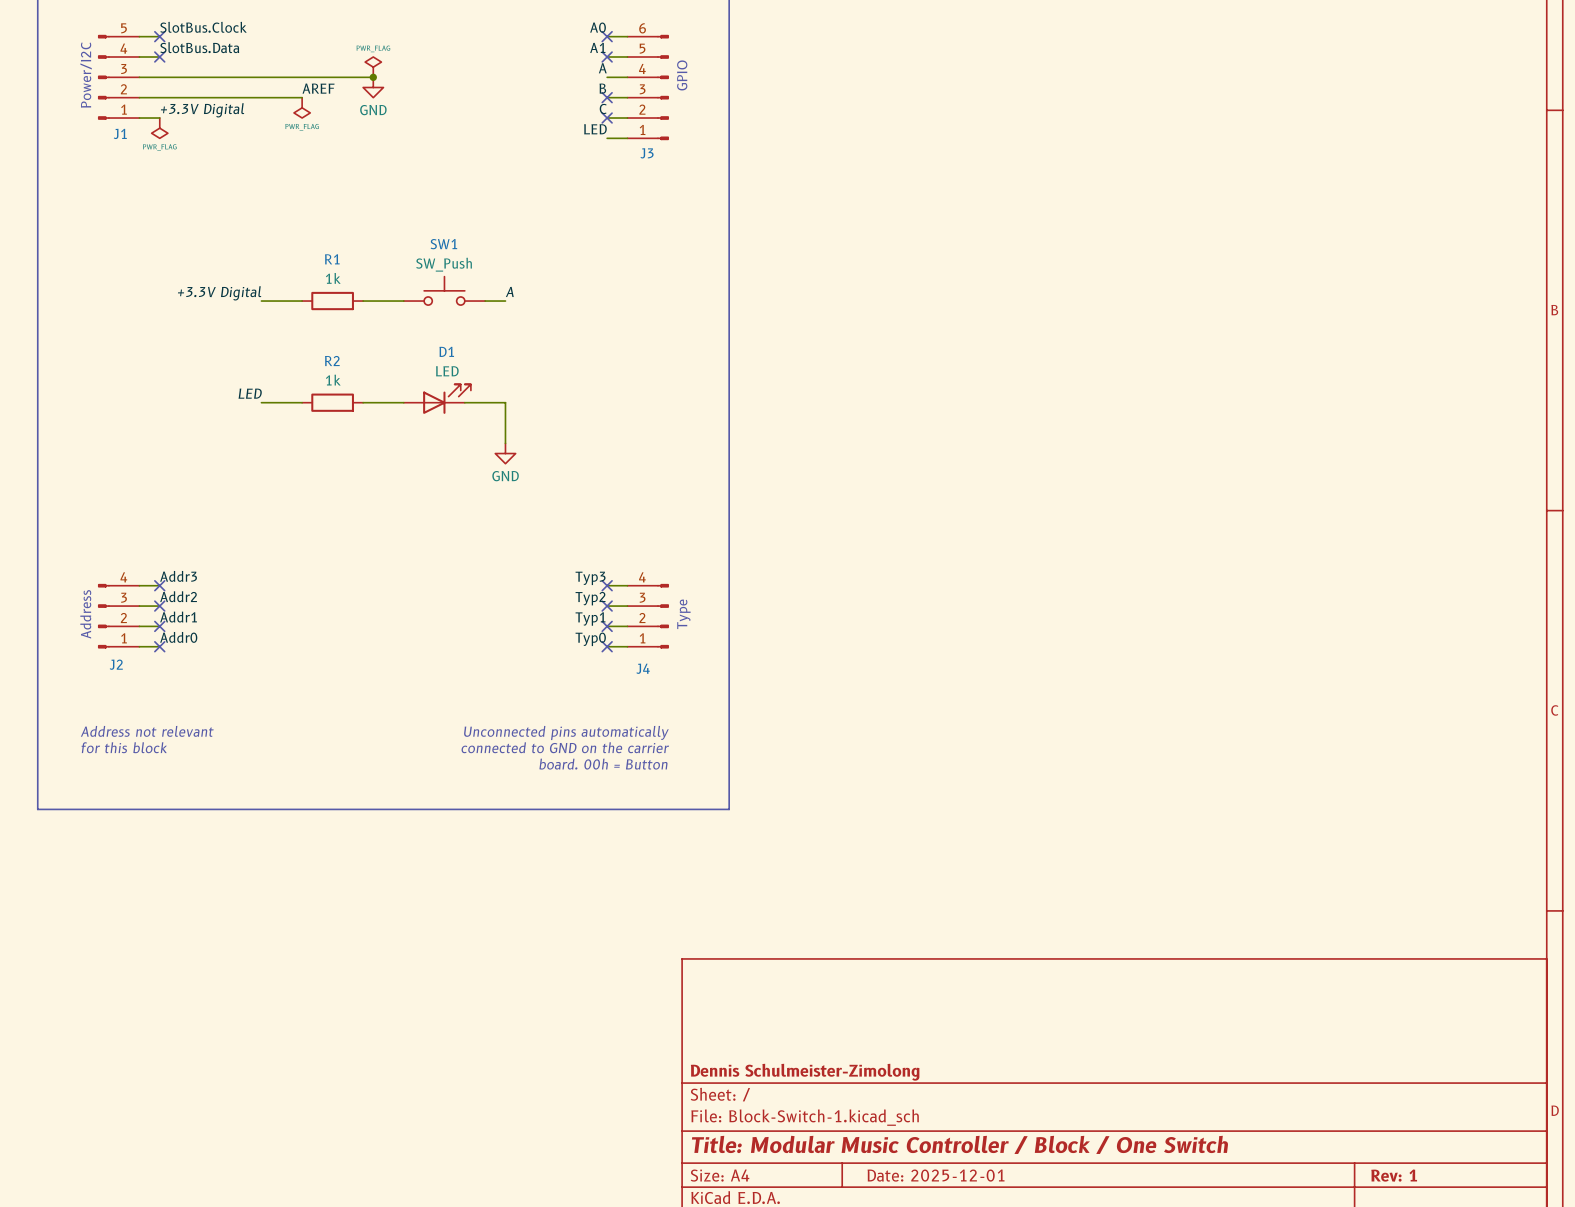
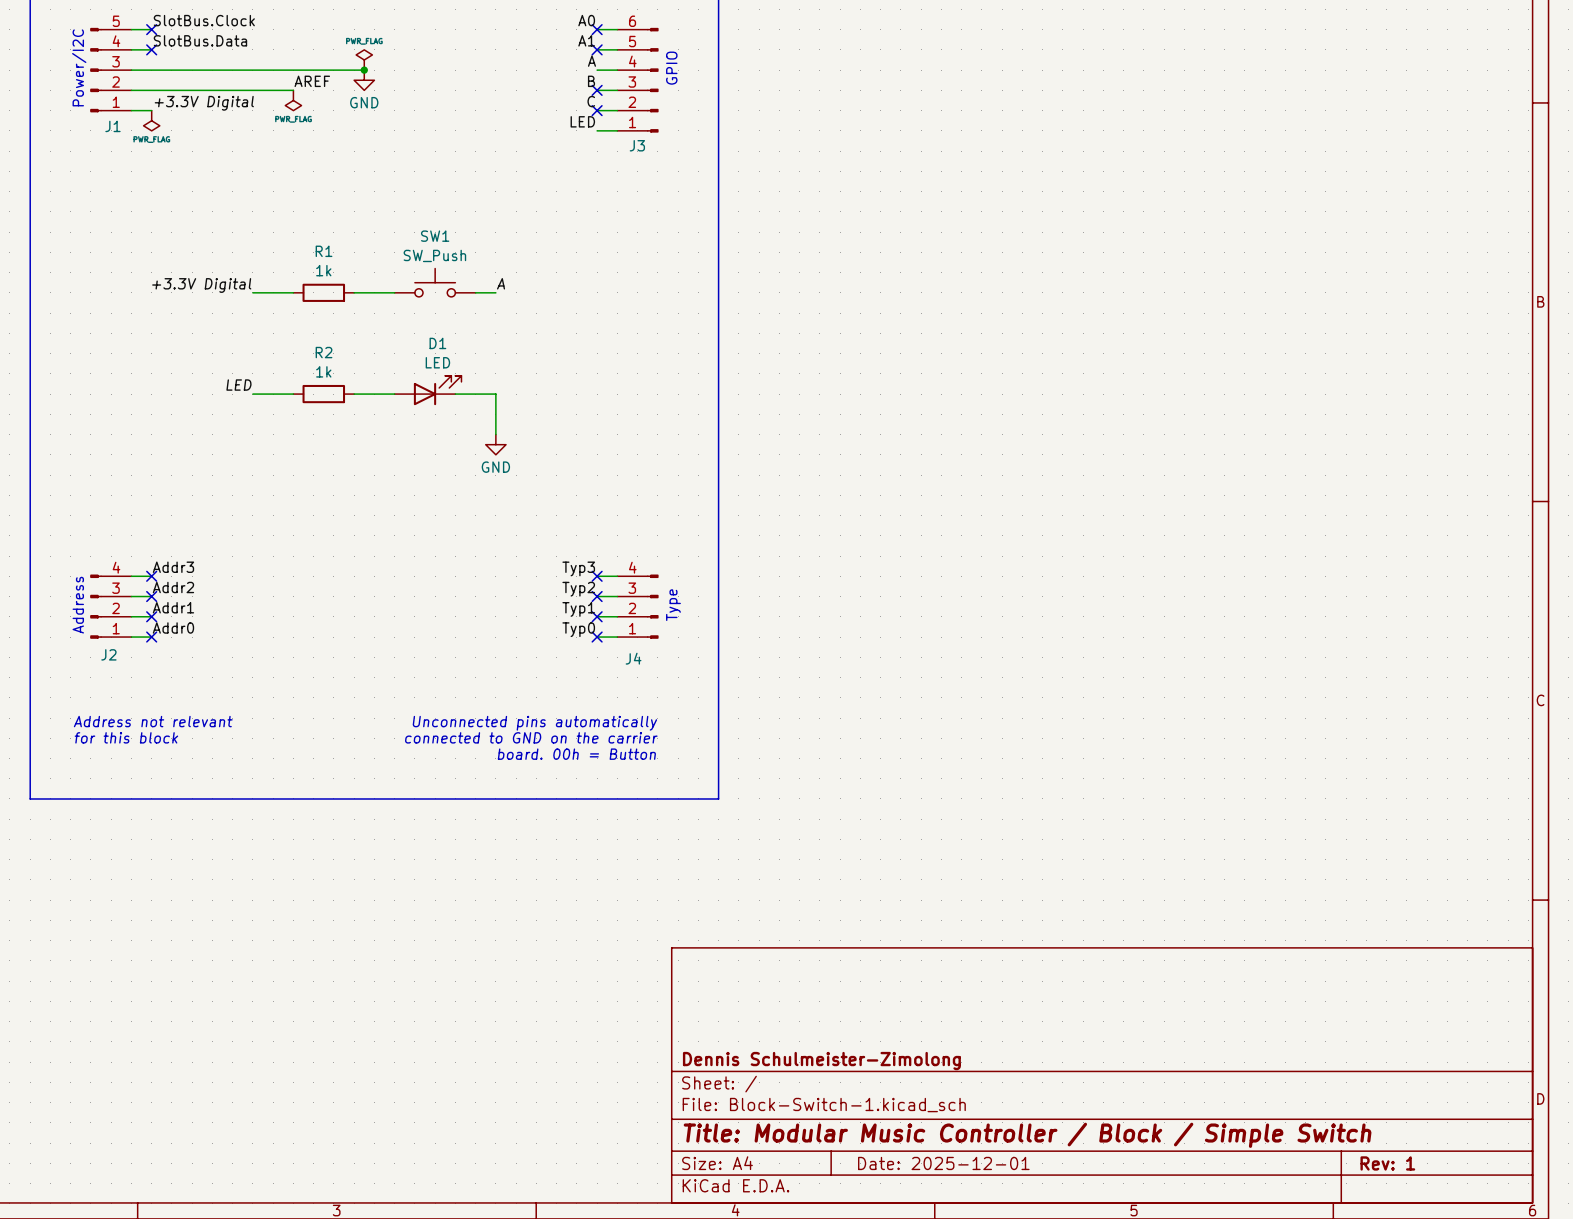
title block: Title: Modular Music Controller / Block / One Switch (959, 1144) -> Title: Modular Music Controller / Block / Simple Switch (1027, 1135)

